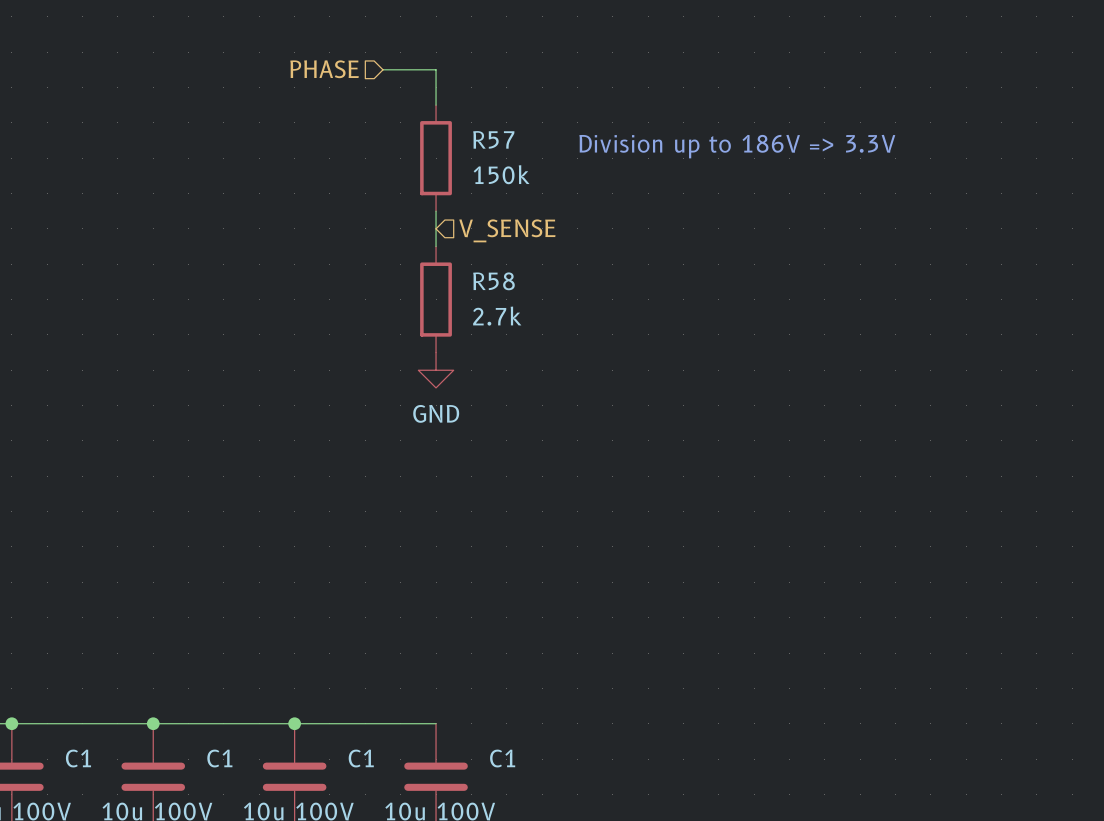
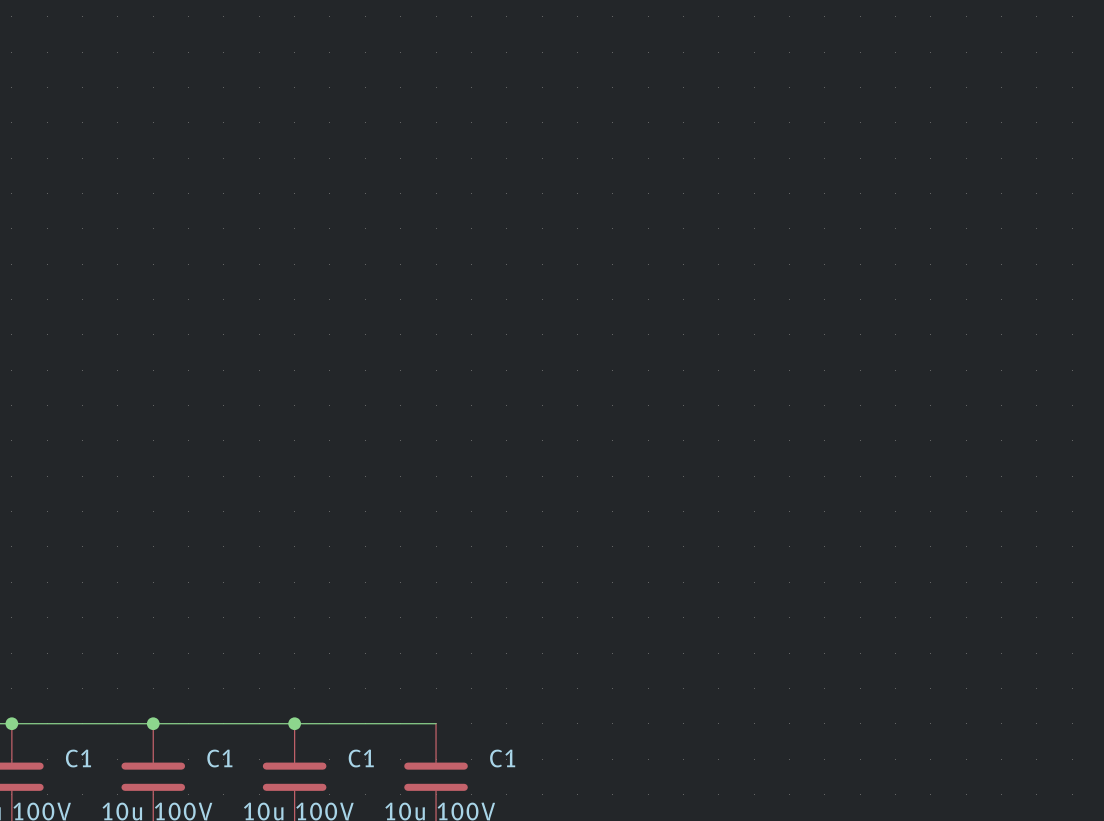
hierarchical label: PHASE (324, 69) -> none
wire: (383, 69) (436, 69) (436, 105) -> none
text: Division up to 186V => 3.3V (737, 146) -> none
R57: 150k (436, 158) -> none
wire: (436, 211) (436, 246) -> none
hierarchical label: V_SENSE (507, 230) -> none
R58: 2.7k (436, 299) -> none
power symbol: GND (436, 370) -> none

